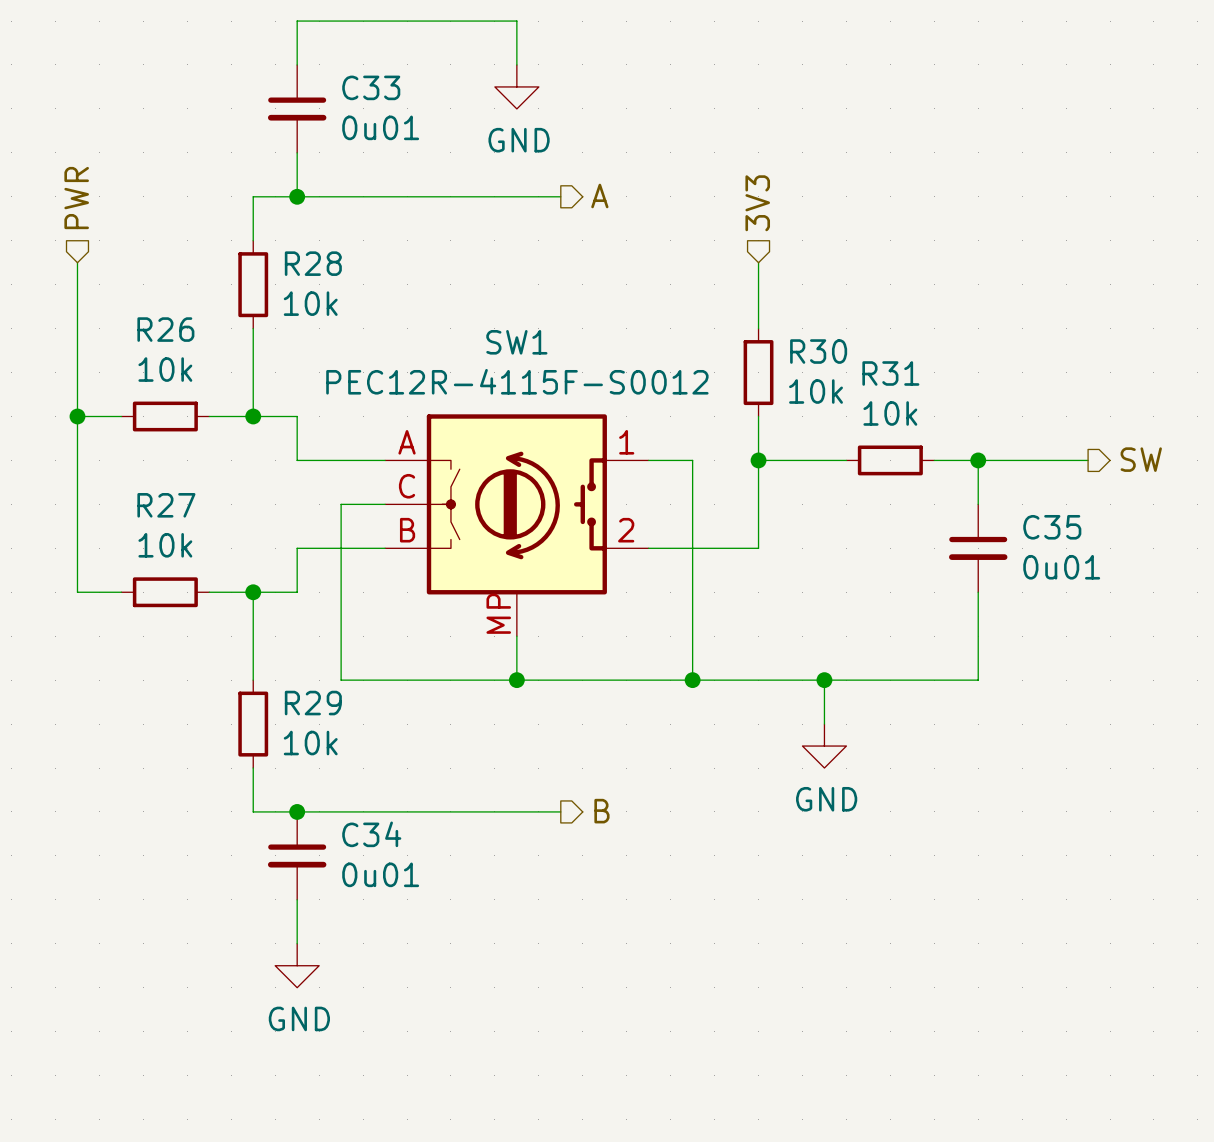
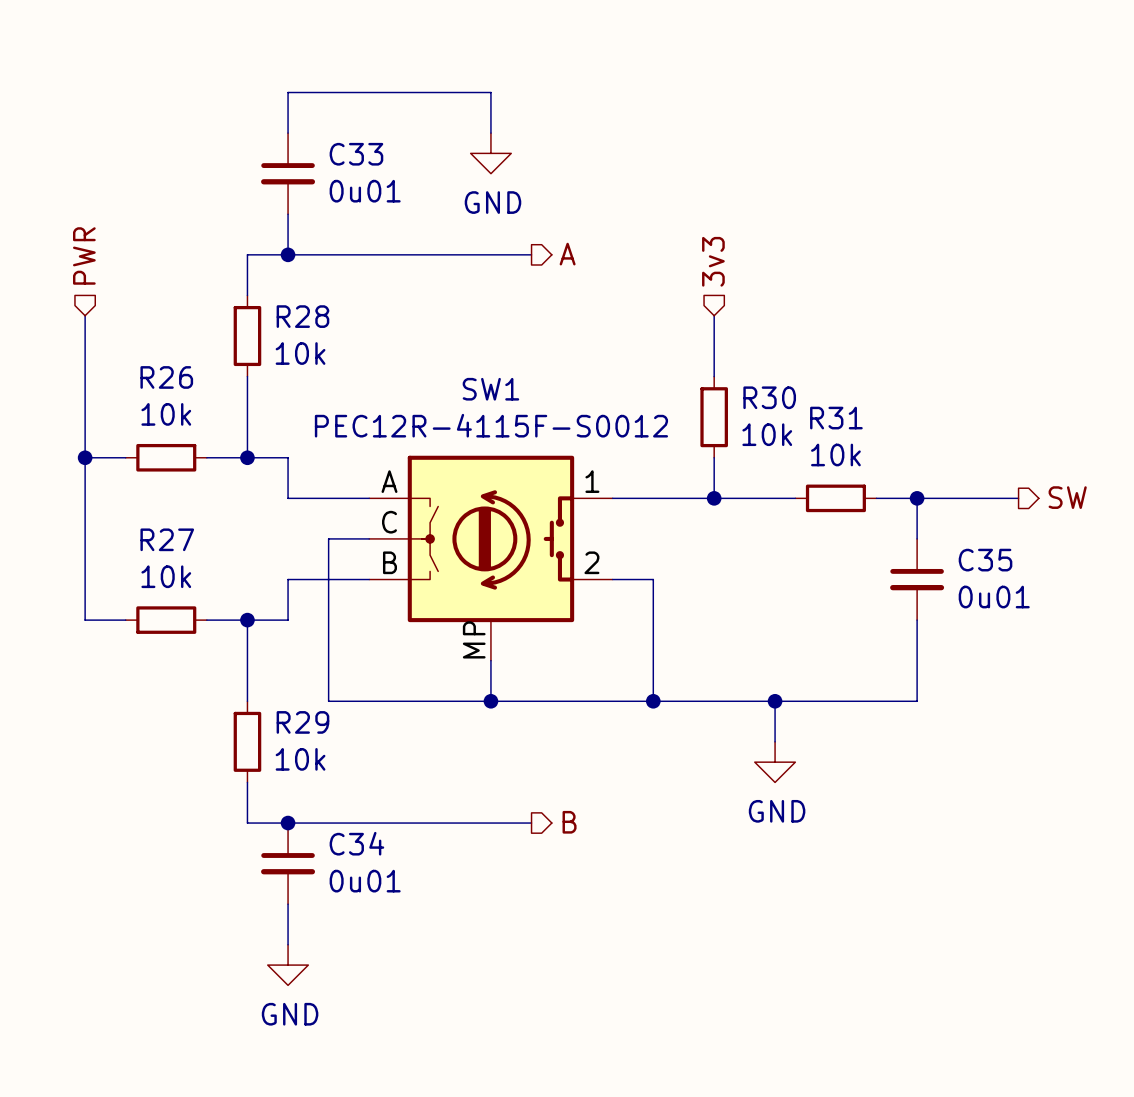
hierarchical label: 3V3 (757, 203) -> 3v3 (713, 261)
wire: (692, 460) (692, 548) (758, 548) (758, 460) -> (653, 498) (714, 498)

